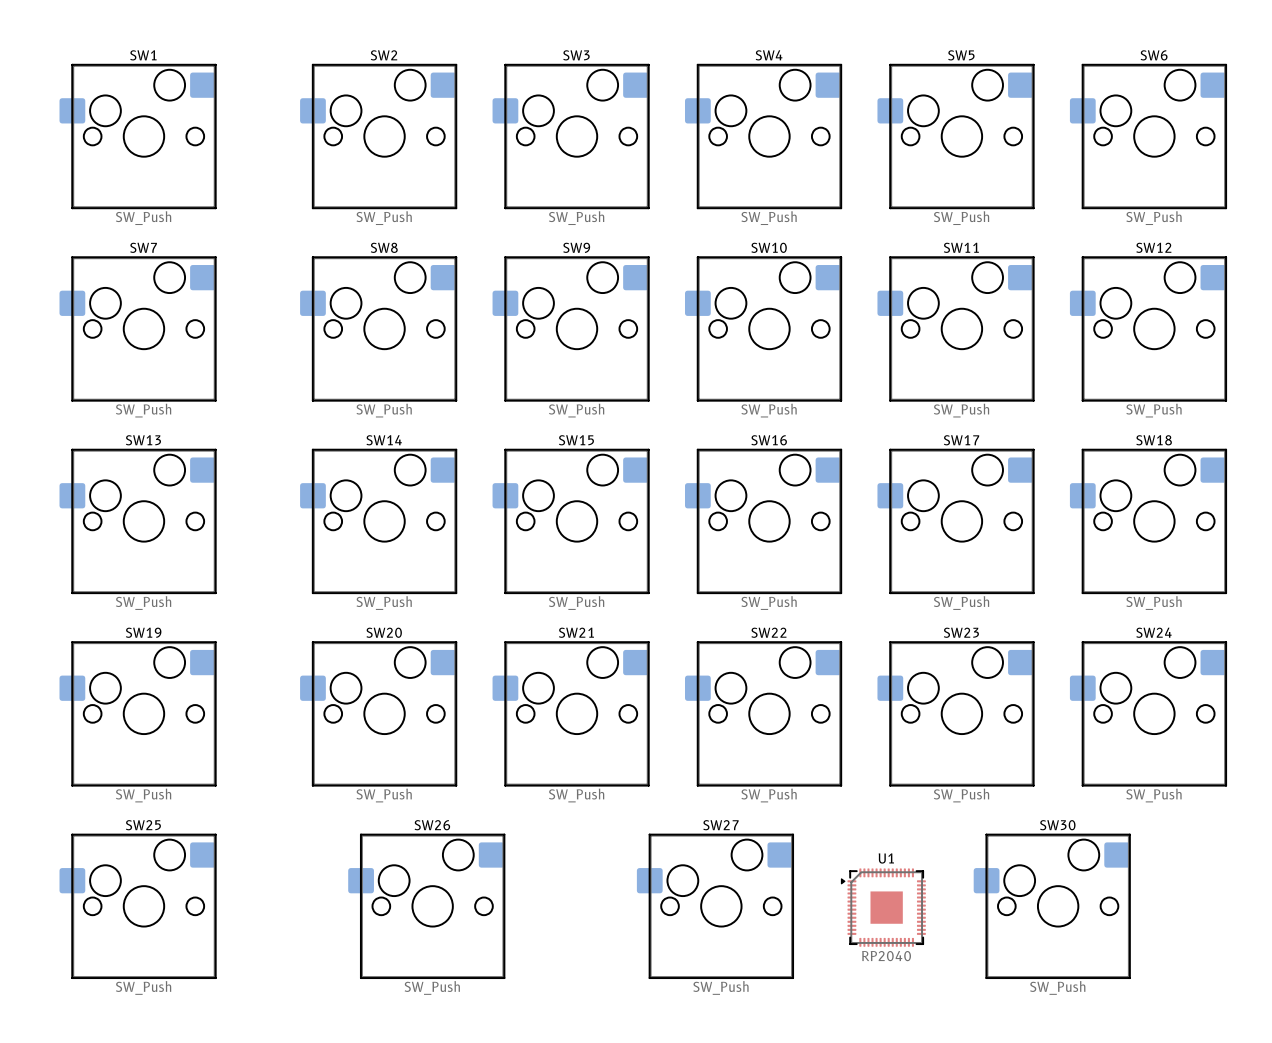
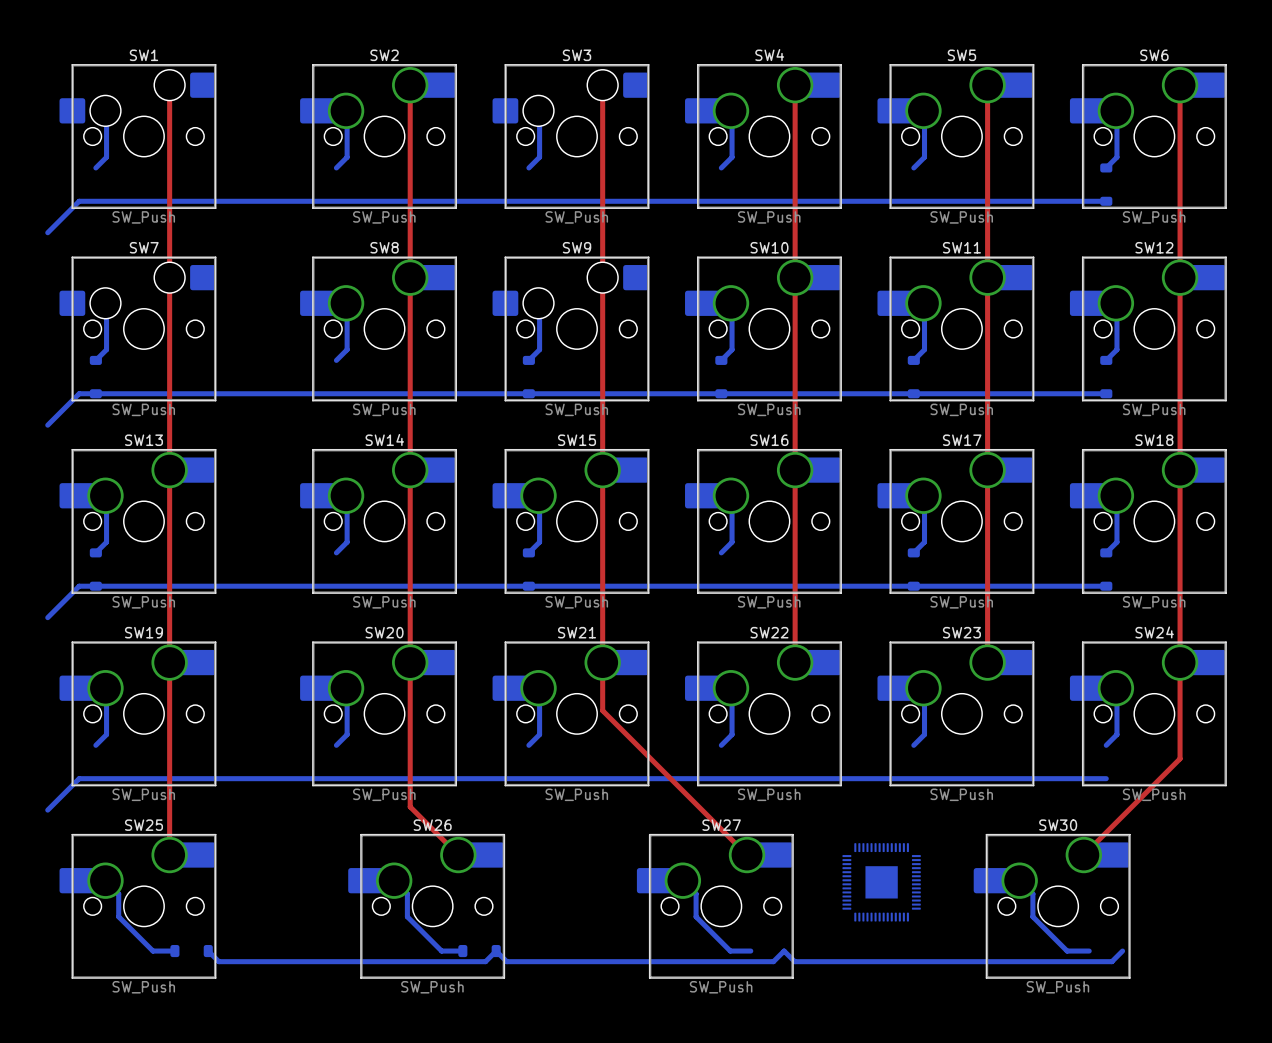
SW2 footprint: [300, 64, 457, 209] -> [300, 64, 457, 209]
SW4 footprint: [685, 64, 842, 209] -> [685, 64, 842, 209]
SW5 footprint: [877, 64, 1035, 209] -> [877, 64, 1035, 209]
SW6 footprint: [1069, 64, 1227, 209] -> [1069, 64, 1227, 209]
top track: none -> (169, 85) (169, 855)
top track: none -> (410, 85) (410, 806) (458, 855)
top track: none -> (602, 85) (602, 710) (747, 855)
top track: none -> (795, 85) (795, 662)
top track: none -> (987, 85) (987, 662)
top track: none -> (1180, 85) (1180, 758) (1083, 855)
bottom track: none -> (105, 110) (106, 157) (95, 167)
bottom track: none -> (346, 110) (347, 157) (336, 167)
bottom track: none -> (538, 110) (539, 157) (528, 167)
bottom track: none -> (730, 110) (732, 157) (721, 167)
bottom track: none -> (923, 110) (924, 157) (913, 167)
bottom track: none -> (1115, 110) (1116, 157) (1106, 167)
part: none -> (1106, 184)
bottom track: none -> (1106, 201) (79, 201) (47, 232)
SW8 footprint: [300, 256, 457, 402] -> [300, 256, 457, 402]
SW10 footprint: [685, 256, 842, 402] -> [685, 256, 842, 402]
SW11 footprint: [877, 256, 1035, 402] -> [877, 256, 1035, 402]
SW12 footprint: [1069, 256, 1227, 402] -> [1069, 256, 1227, 402]
bottom track: none -> (105, 303) (106, 349) (95, 360)
bottom track: none -> (346, 303) (347, 349) (336, 360)
bottom track: none -> (538, 303) (539, 349) (528, 360)
bottom track: none -> (730, 303) (732, 349) (721, 360)
bottom track: none -> (923, 303) (924, 349) (913, 360)
bottom track: none -> (1115, 303) (1116, 349) (1106, 360)
part: none -> (95, 377)
part: none -> (528, 377)
part: none -> (721, 377)
part: none -> (913, 377)
part: none -> (1106, 377)
bottom track: none -> (1106, 393) (79, 393) (47, 425)
SW13 footprint: [59, 449, 217, 594] -> [59, 449, 217, 594]
SW14 footprint: [300, 449, 457, 594] -> [300, 449, 457, 594]
SW15 footprint: [492, 449, 650, 594] -> [492, 449, 650, 594]
SW16 footprint: [685, 449, 842, 594] -> [685, 449, 842, 594]
SW17 footprint: [877, 449, 1035, 594] -> [877, 449, 1035, 594]
SW18 footprint: [1069, 449, 1227, 594] -> [1069, 449, 1227, 594]
bottom track: none -> (105, 495) (106, 542) (95, 552)
bottom track: none -> (346, 495) (347, 542) (336, 552)
bottom track: none -> (538, 495) (539, 542) (528, 552)
bottom track: none -> (730, 495) (732, 542) (721, 552)
bottom track: none -> (923, 495) (924, 542) (913, 552)
bottom track: none -> (1115, 495) (1116, 542) (1106, 552)
part: none -> (95, 569)
part: none -> (528, 569)
part: none -> (913, 569)
part: none -> (1106, 569)
bottom track: none -> (1106, 586) (79, 586) (47, 617)
SW19 footprint: [59, 641, 217, 787] -> [59, 641, 217, 787]
SW20 footprint: [300, 641, 457, 787] -> [300, 641, 457, 787]
SW21 footprint: [492, 641, 650, 787] -> [492, 641, 650, 787]
SW22 footprint: [685, 641, 842, 787] -> [685, 641, 842, 787]
SW23 footprint: [877, 641, 1035, 787] -> [877, 641, 1035, 787]
SW24 footprint: [1069, 641, 1227, 787] -> [1069, 641, 1227, 787]
bottom track: none -> (105, 688) (106, 734) (95, 745)
bottom track: none -> (346, 688) (347, 734) (336, 745)
bottom track: none -> (538, 688) (539, 734) (528, 745)
bottom track: none -> (730, 688) (732, 734) (721, 745)
bottom track: none -> (923, 688) (924, 734) (913, 745)
bottom track: none -> (1115, 688) (1116, 734) (1106, 745)
bottom track: none -> (1106, 778) (79, 778) (47, 810)
SW25 footprint: [59, 834, 217, 979] -> [59, 834, 217, 979]
SW26 footprint: [348, 834, 505, 979] -> [348, 834, 506, 979]
SW27 footprint: [636, 834, 794, 979] -> [636, 834, 794, 979]
SW30 footprint: [973, 834, 1131, 979] -> [973, 834, 1131, 979]
bottom track: none -> (105, 880) (118, 893) (118, 916) (152, 951) (174, 951)
bottom track: none -> (394, 880) (407, 893) (407, 916) (441, 951) (462, 951)
bottom track: none -> (682, 880) (696, 893) (696, 916) (730, 951) (750, 951)
bottom track: none -> (1019, 880) (1032, 893) (1032, 916) (1067, 951) (1089, 951)
U1 side: top (883, 907) -> bottom (881, 882)
part: none -> (191, 951)
bottom track: none -> (208, 951) (218, 961) (485, 961) (496, 951) (506, 961) (773, 961) (784, 951) (794, 961) (1111, 961) (1122, 951)
part: none -> (479, 951)

